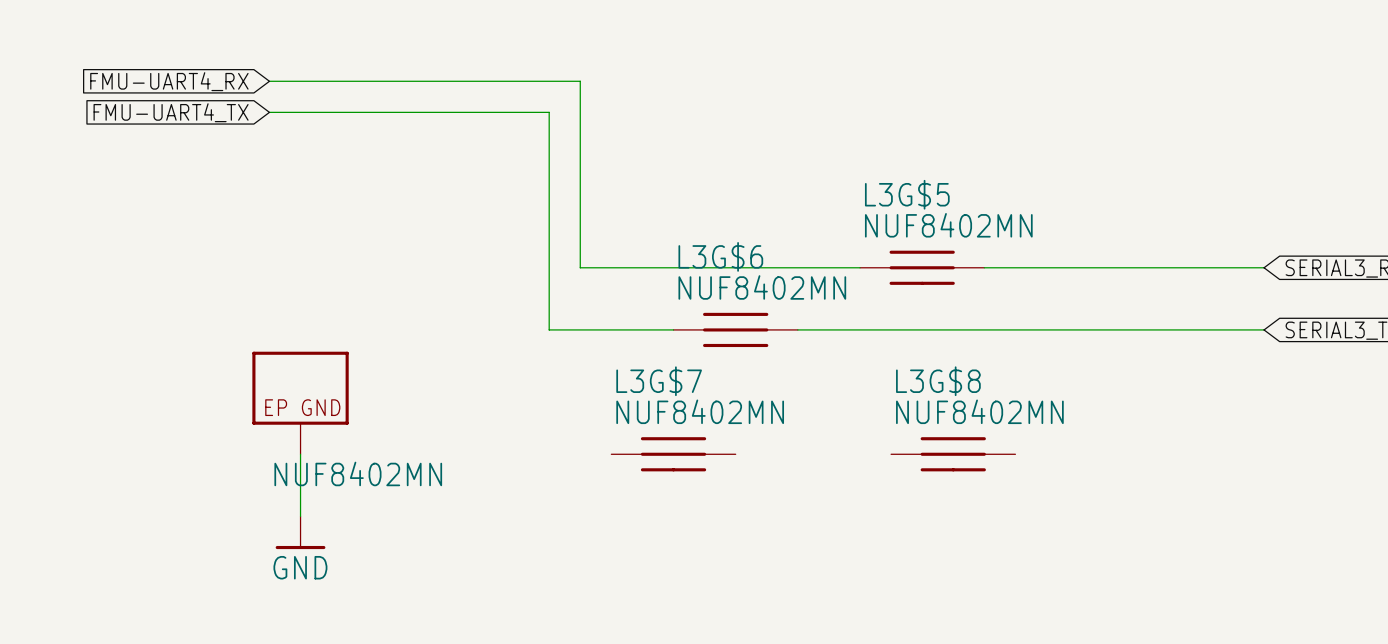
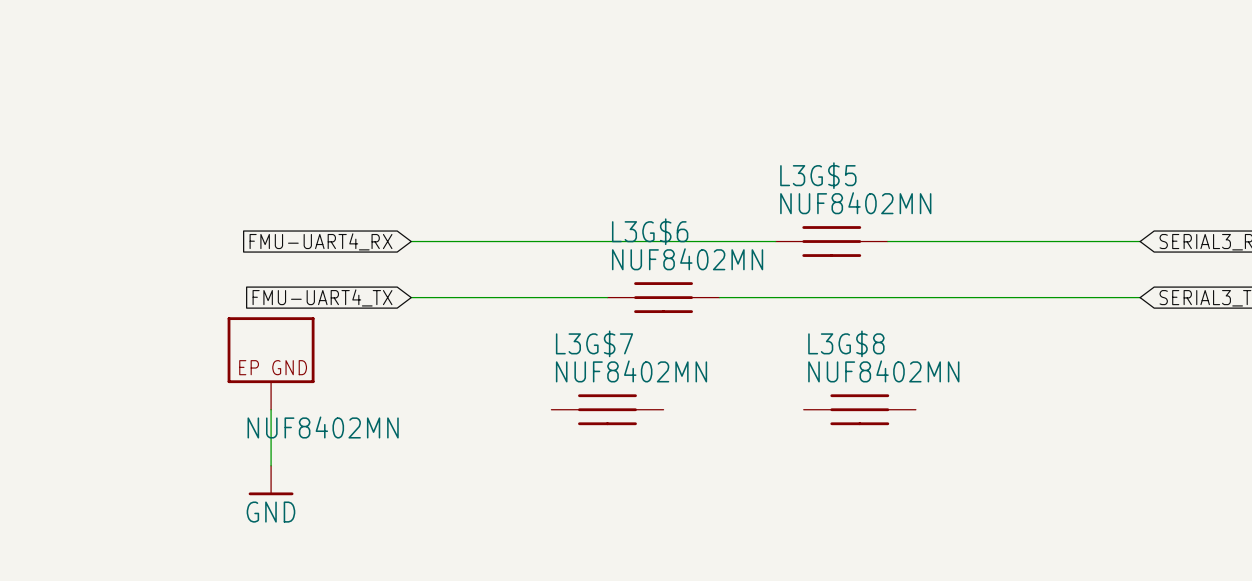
global label position: FMU-UART4_RX (169, 81) -> FMU-UART4_RX (320, 241)
wire: (269, 81) (580, 81) (580, 267) -> (411, 241) (523, 241)
global label position: FMU-UART4_TX (171, 112) -> FMU-UART4_TX (322, 297)
wire: (269, 112) (549, 112) (549, 329) -> (411, 297) (495, 297)

